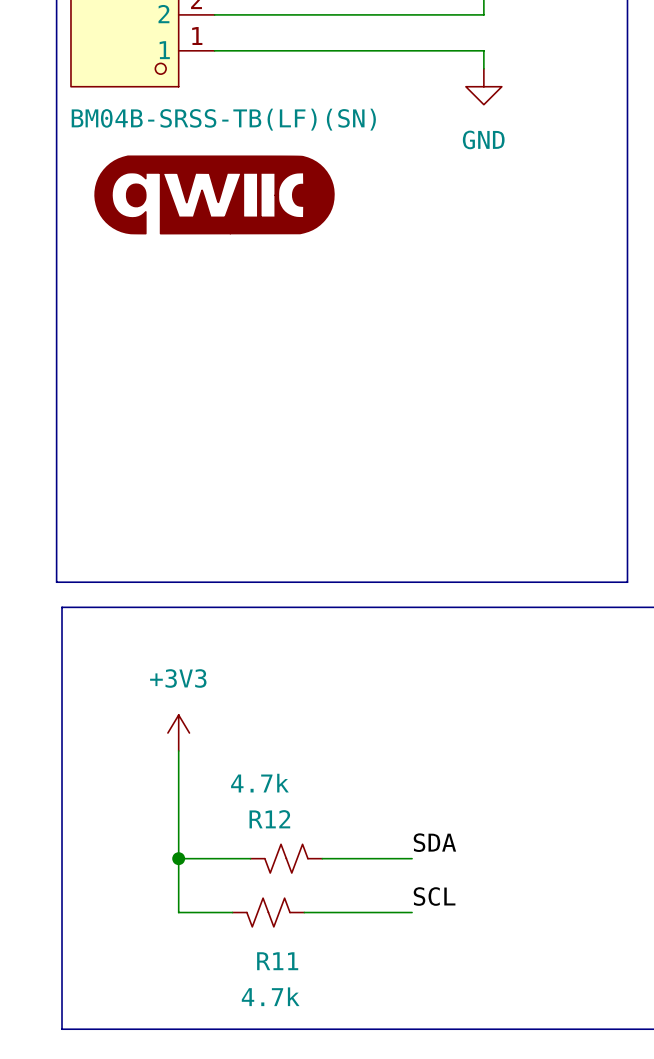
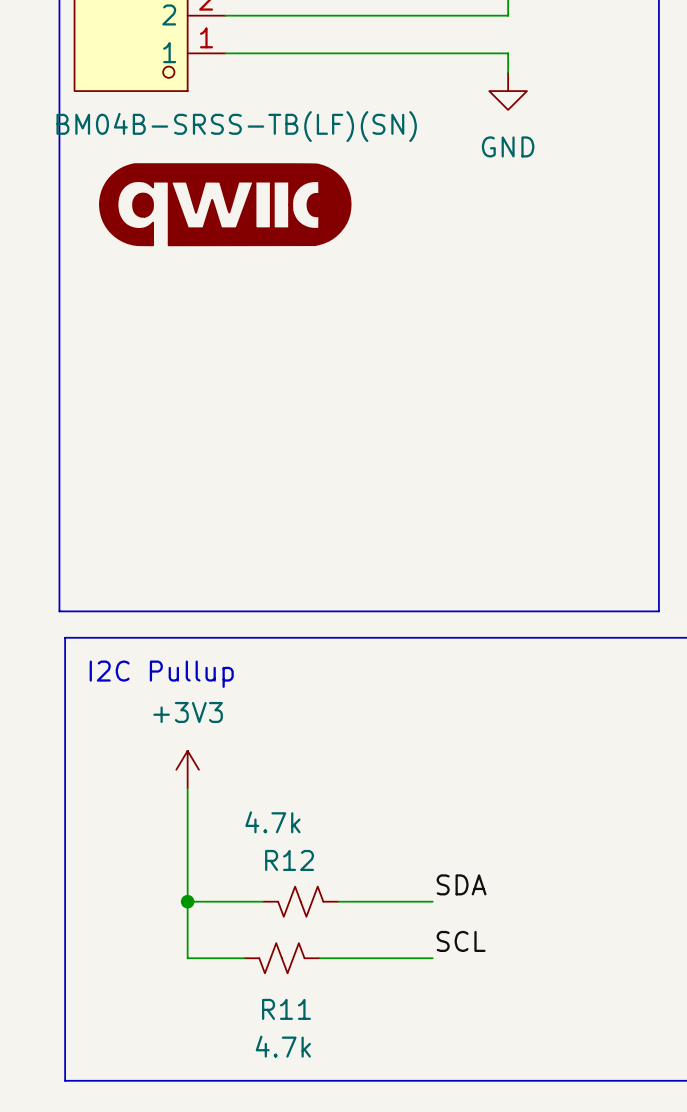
text: none -> I2C Pullup (161, 674)

